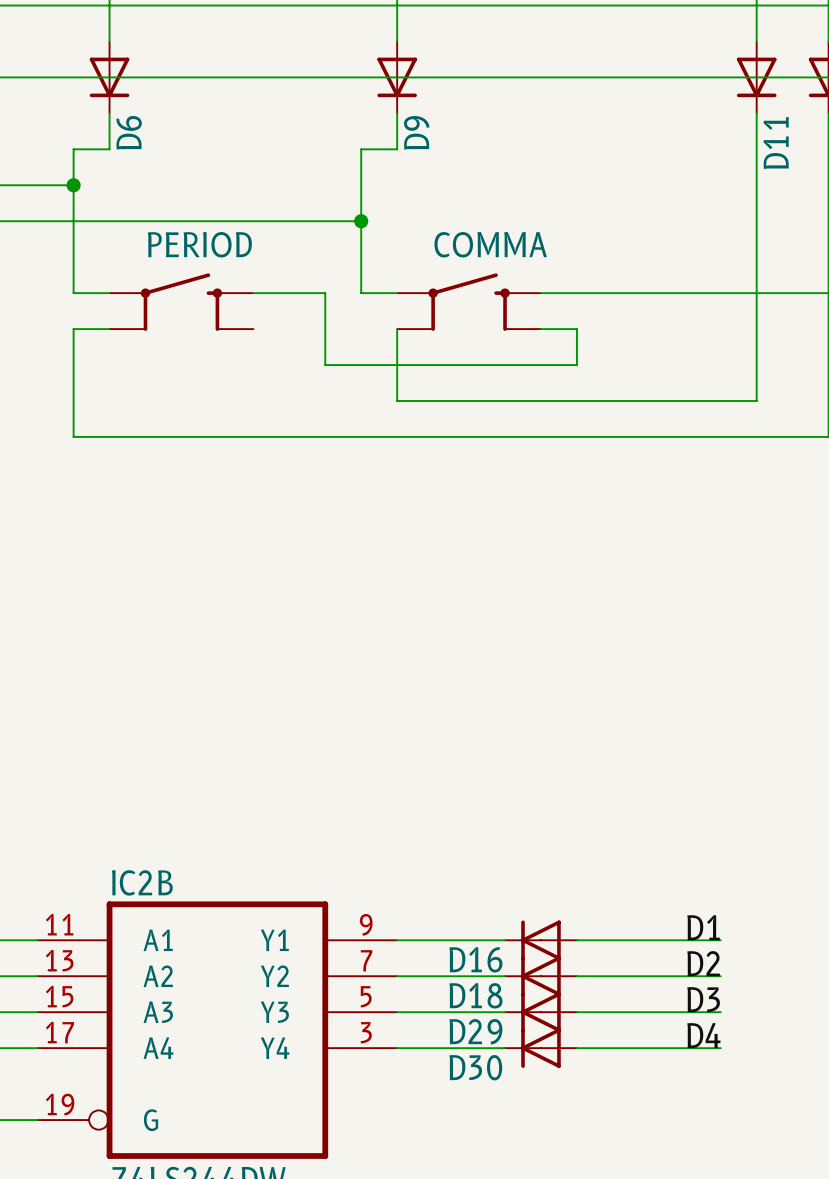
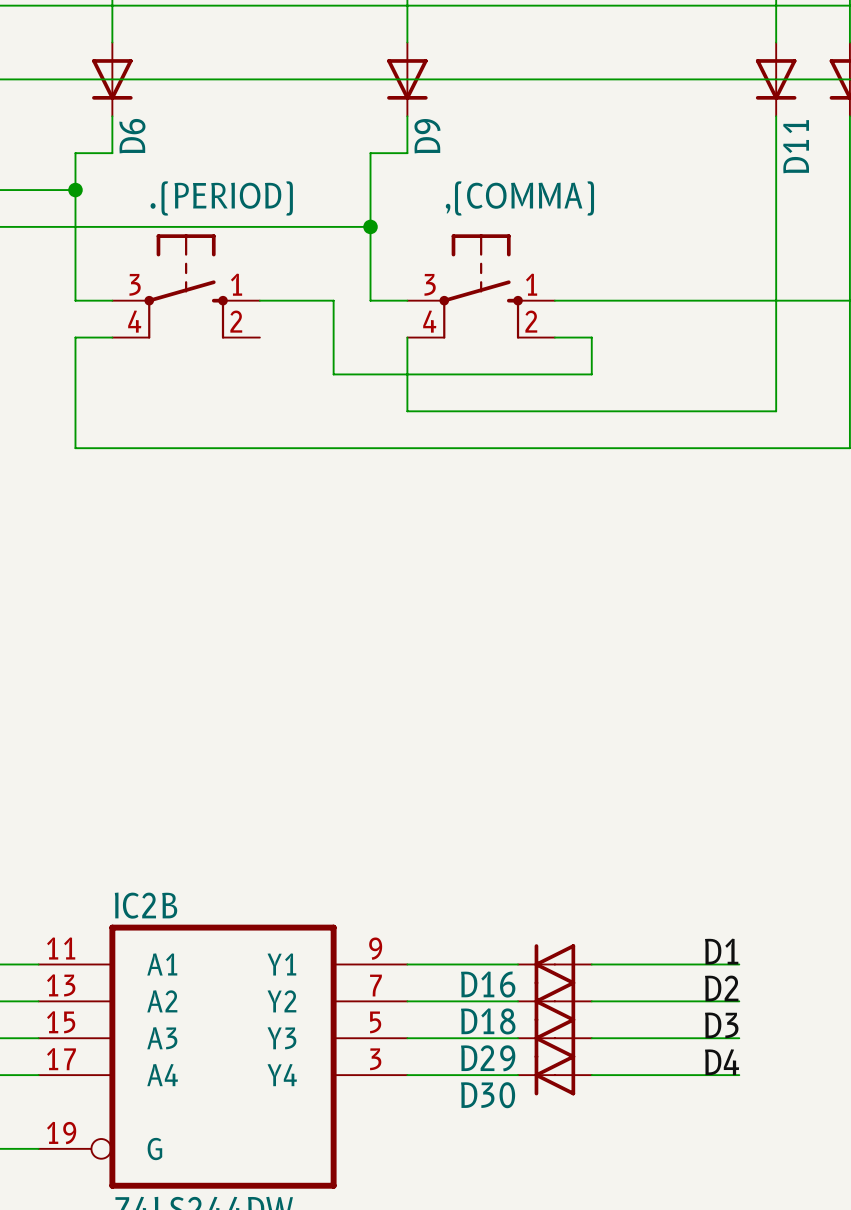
.(PERIOD): none -> (186, 286)
,(COMMA): none -> (481, 286)
PERIOD: (181, 302) -> none
COMMA: (469, 302) -> none

